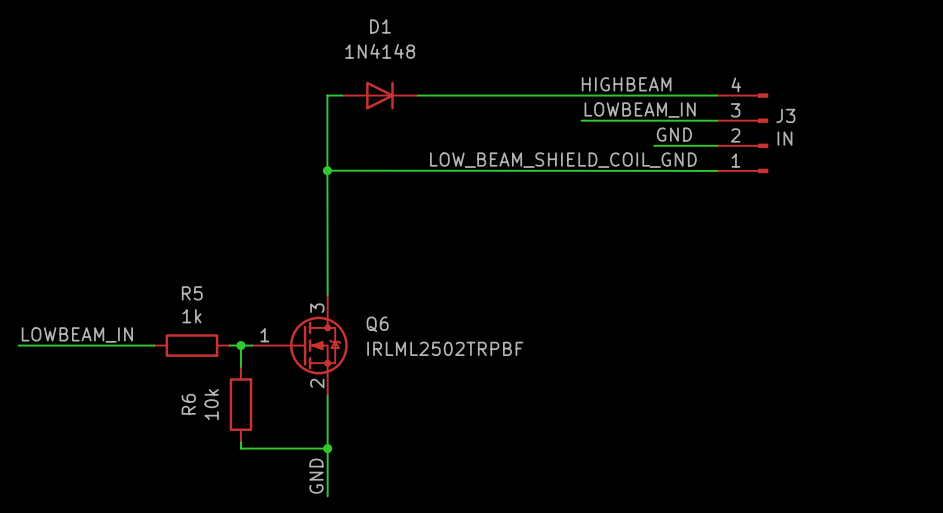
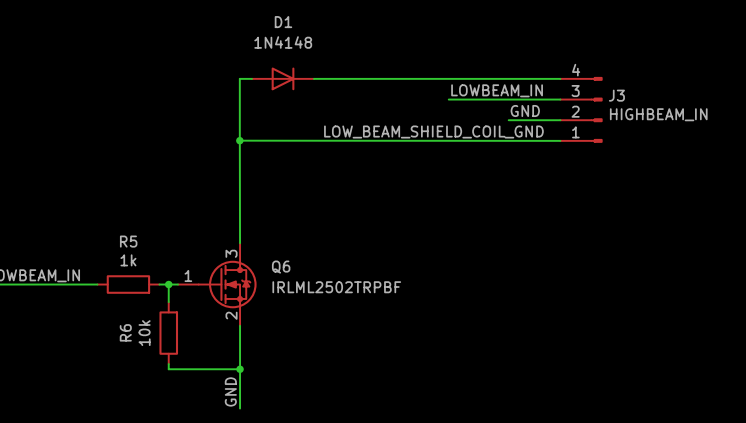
label: HIGHBEAM (626, 84) -> none
J3 value: IN (784, 138) -> HIGHBEAM_IN (658, 114)

